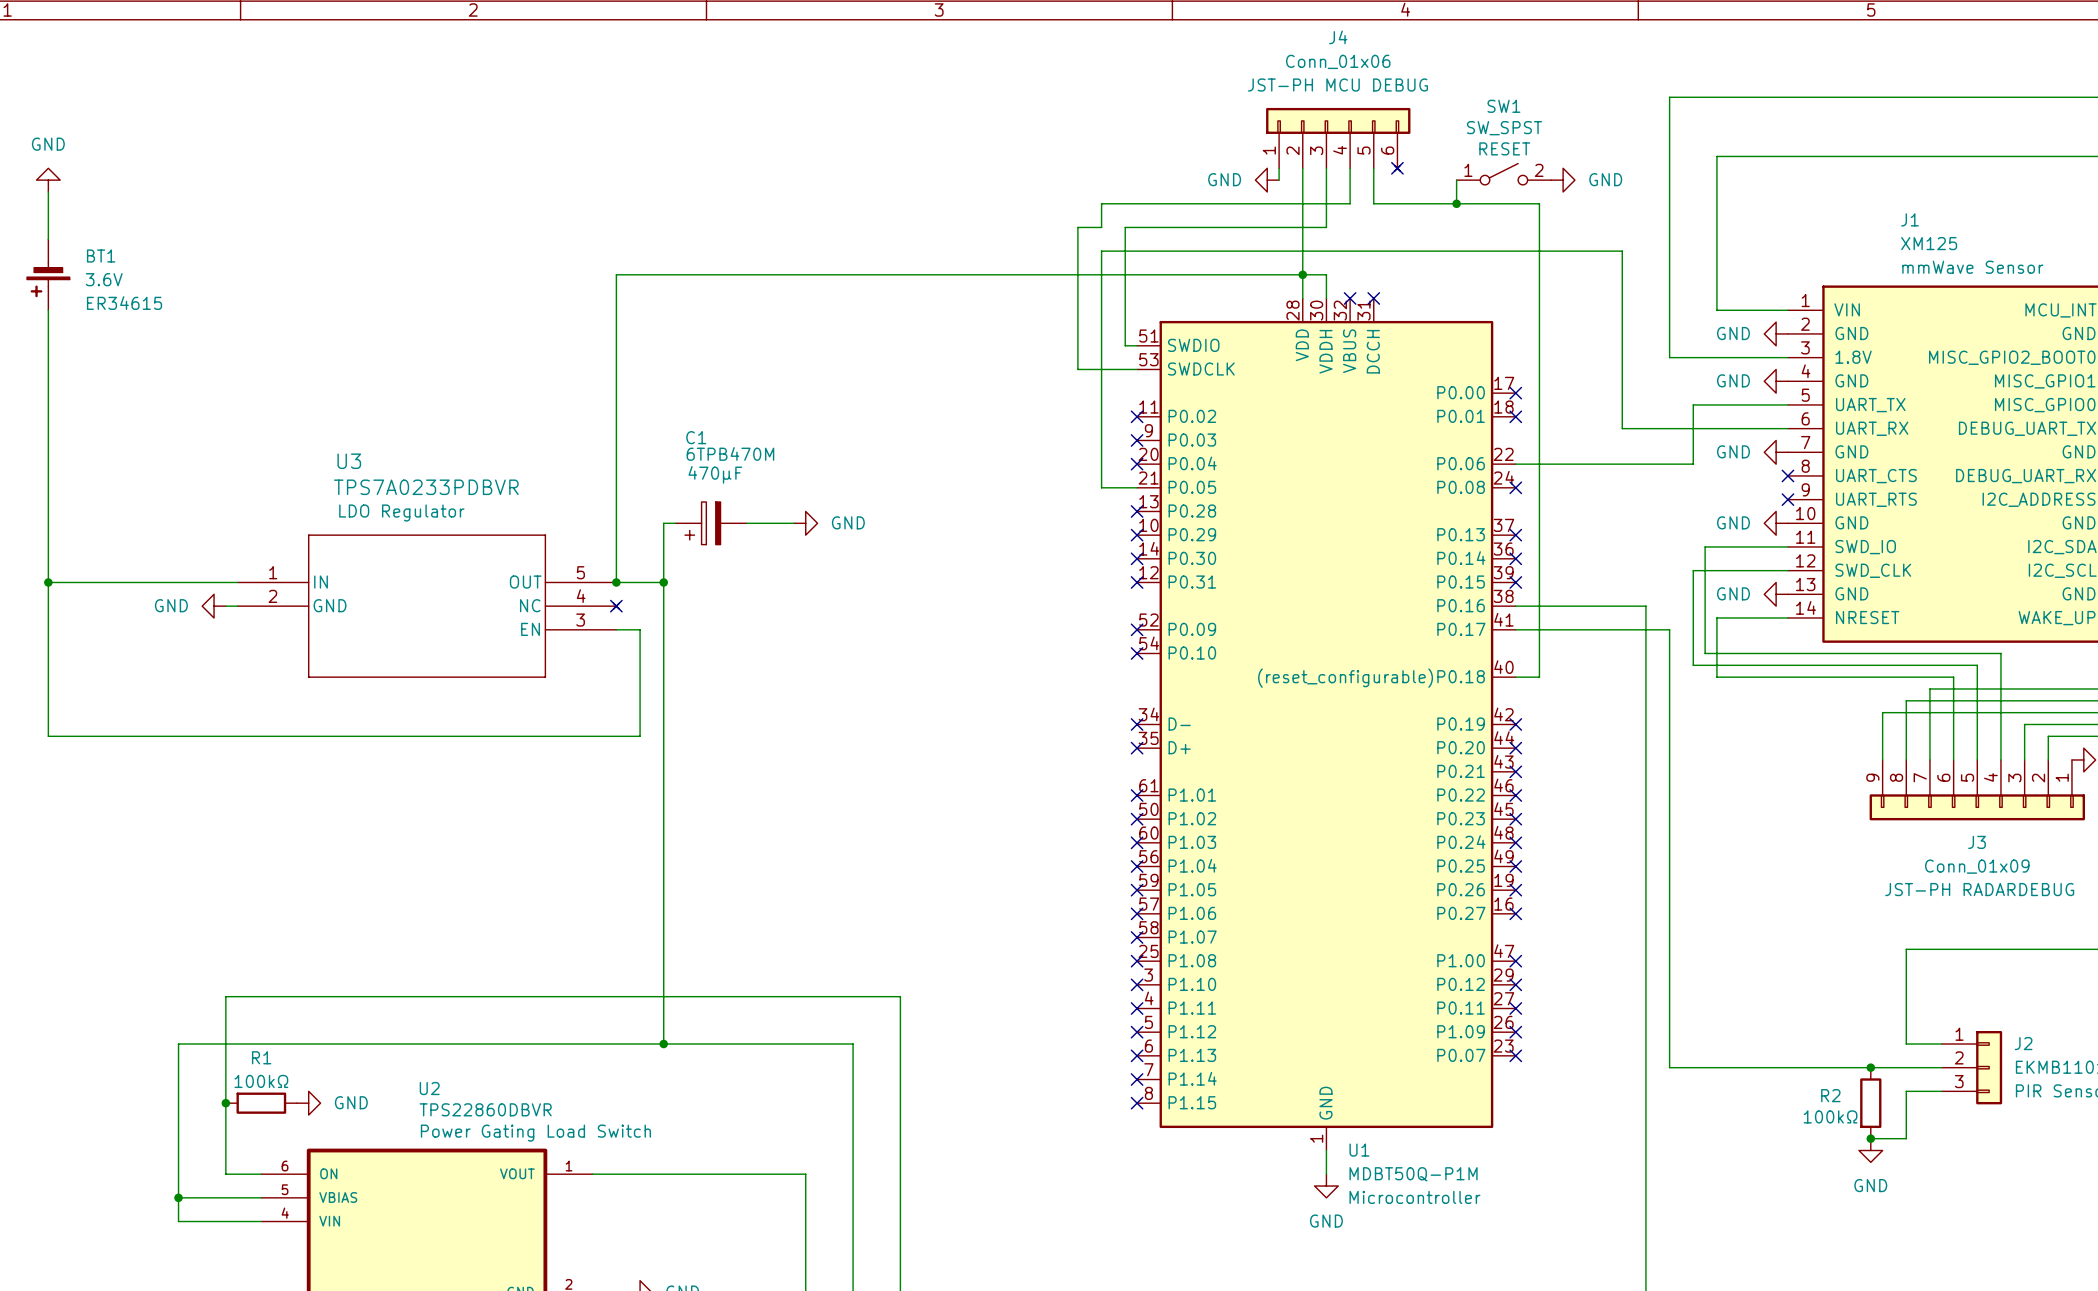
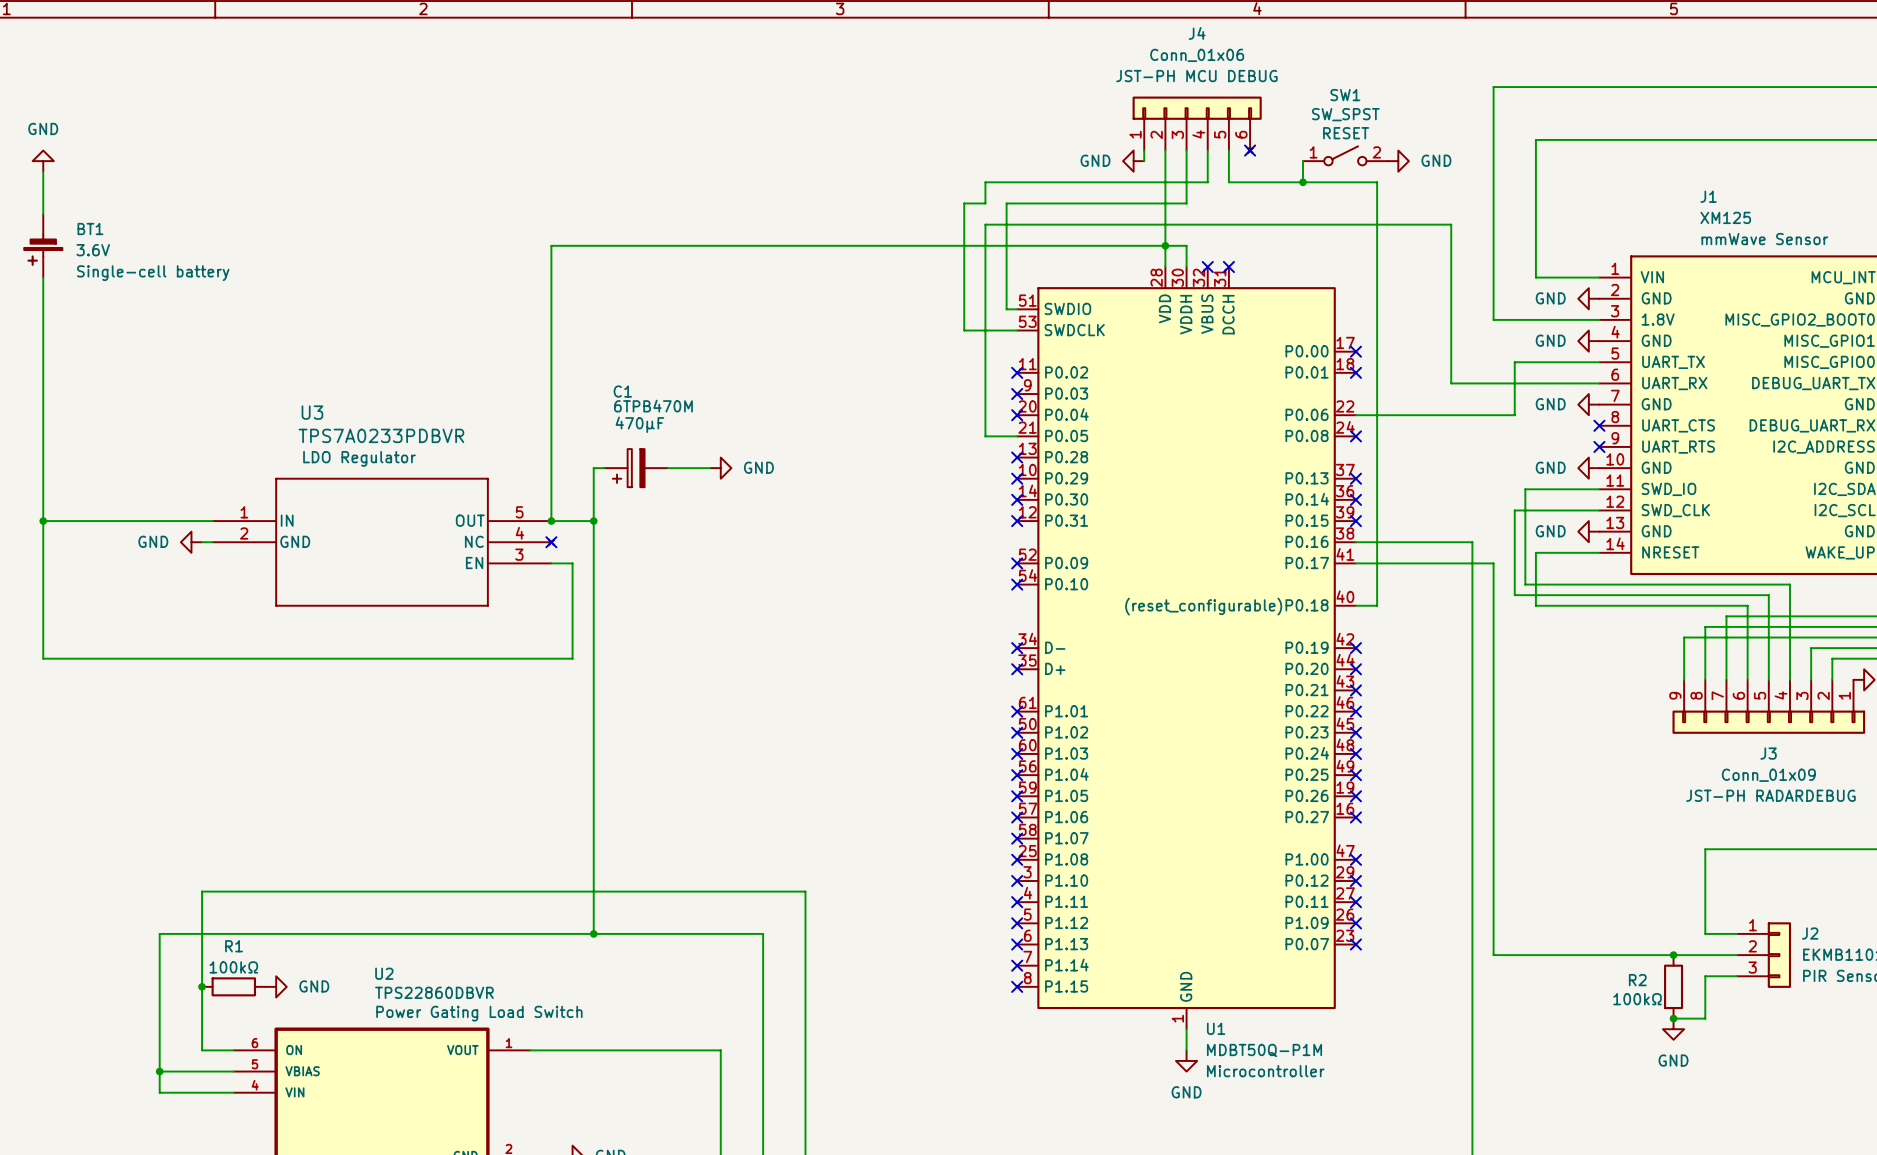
BT1 text: ER34615 (124, 303) -> Single-cell battery (153, 273)

